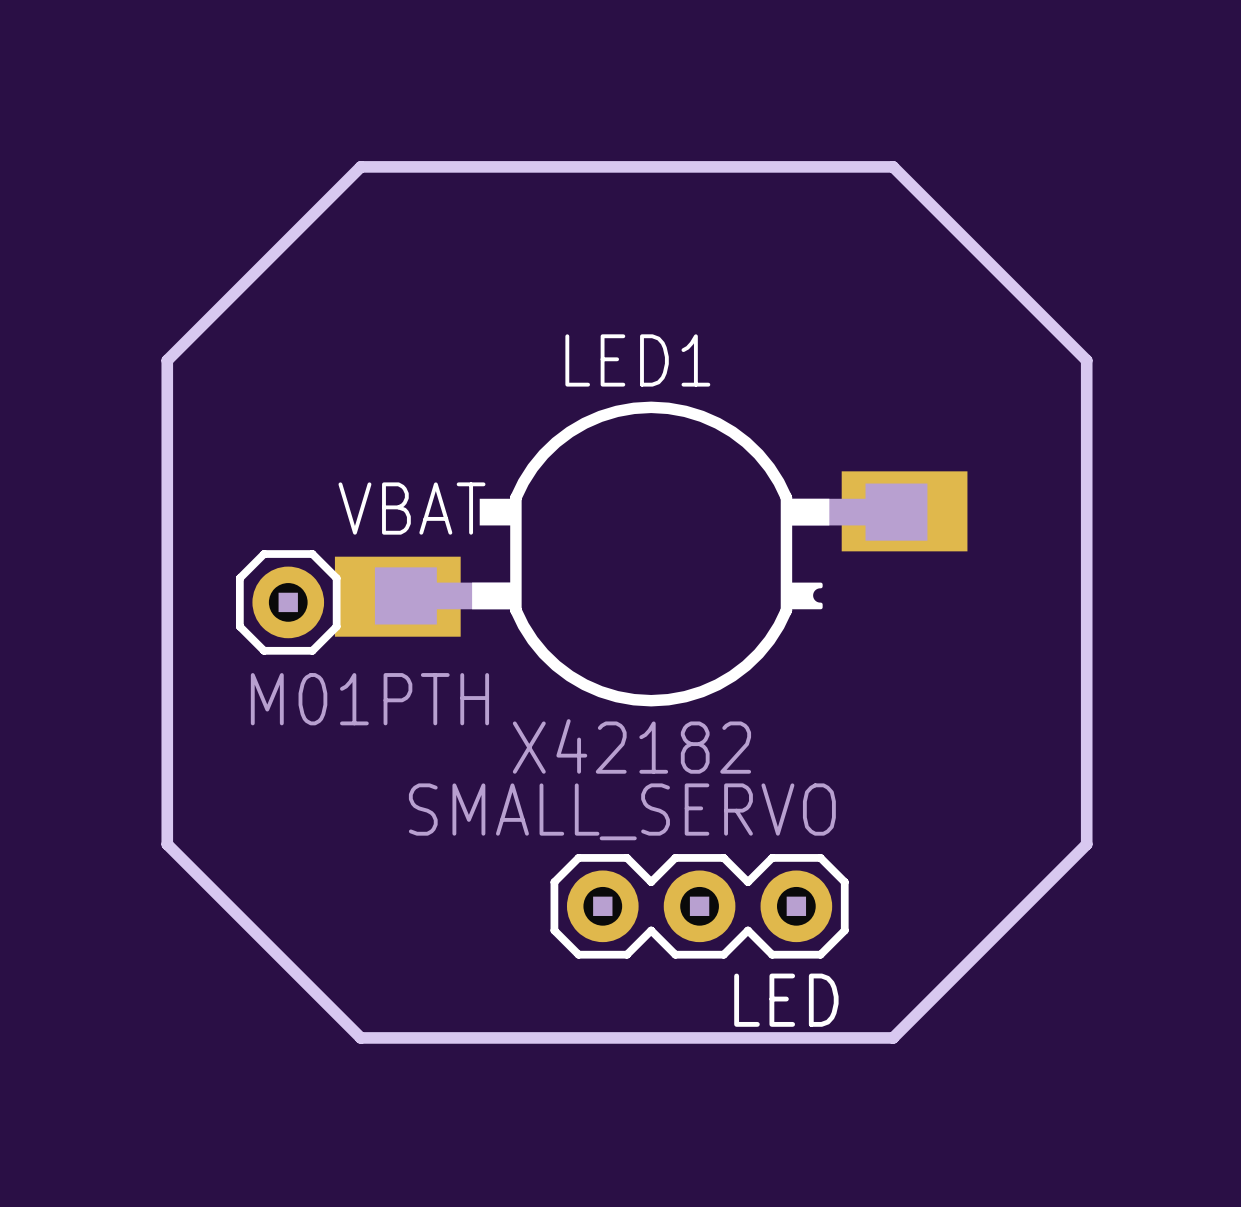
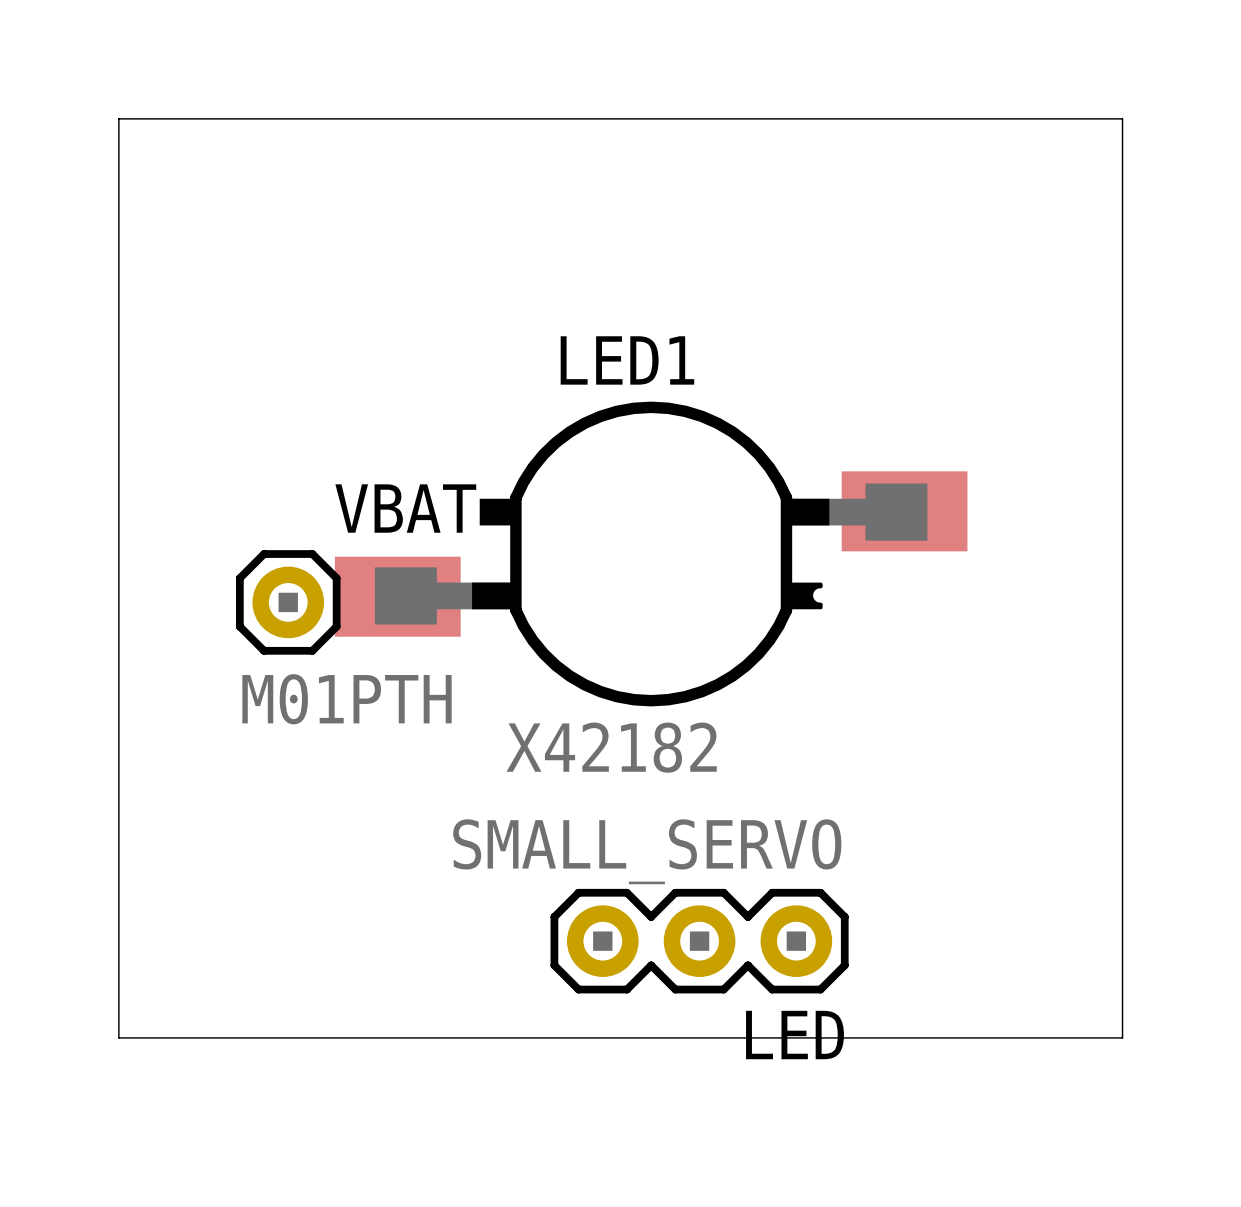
LED position: (699, 906) -> (699, 941)
board edge: (360, 1037) (167, 844) (167, 360) (360, 166) (893, 166) (1086, 360) (1086, 844) (893, 1037) -> (360, 1037) (118, 1037) (118, 118) (1122, 118) (1122, 1037) (893, 1037)
board edge width: thick (360, 1037) (893, 1037) -> thin (360, 1037) (893, 1037)

